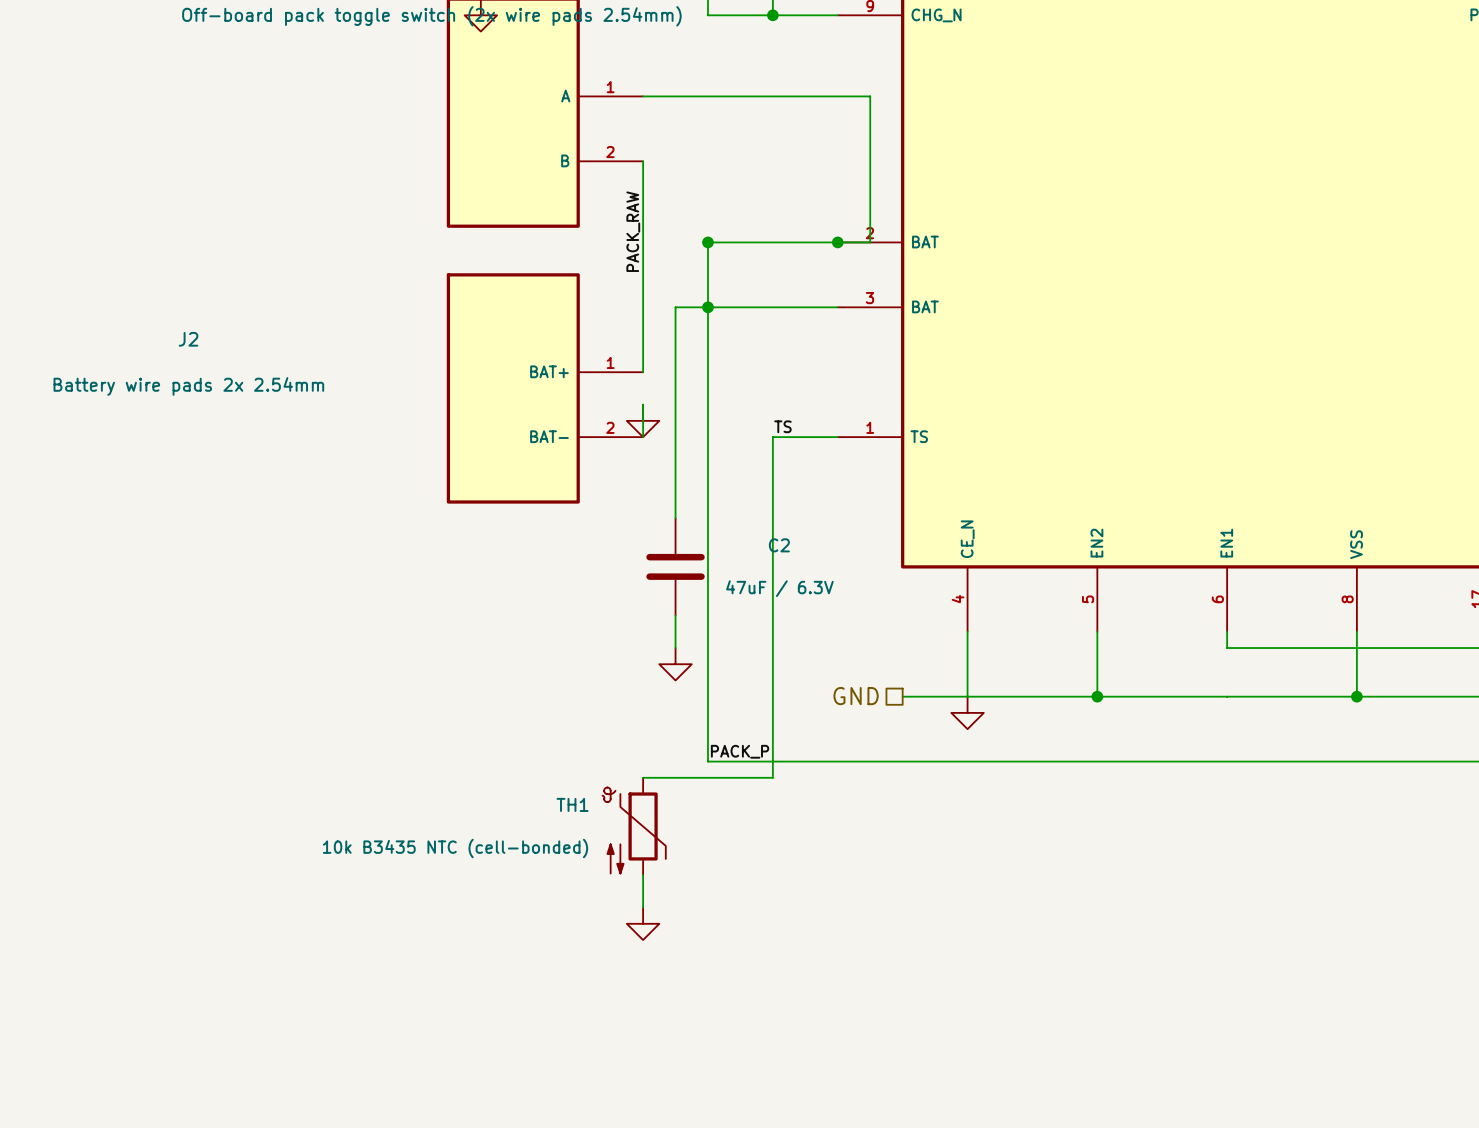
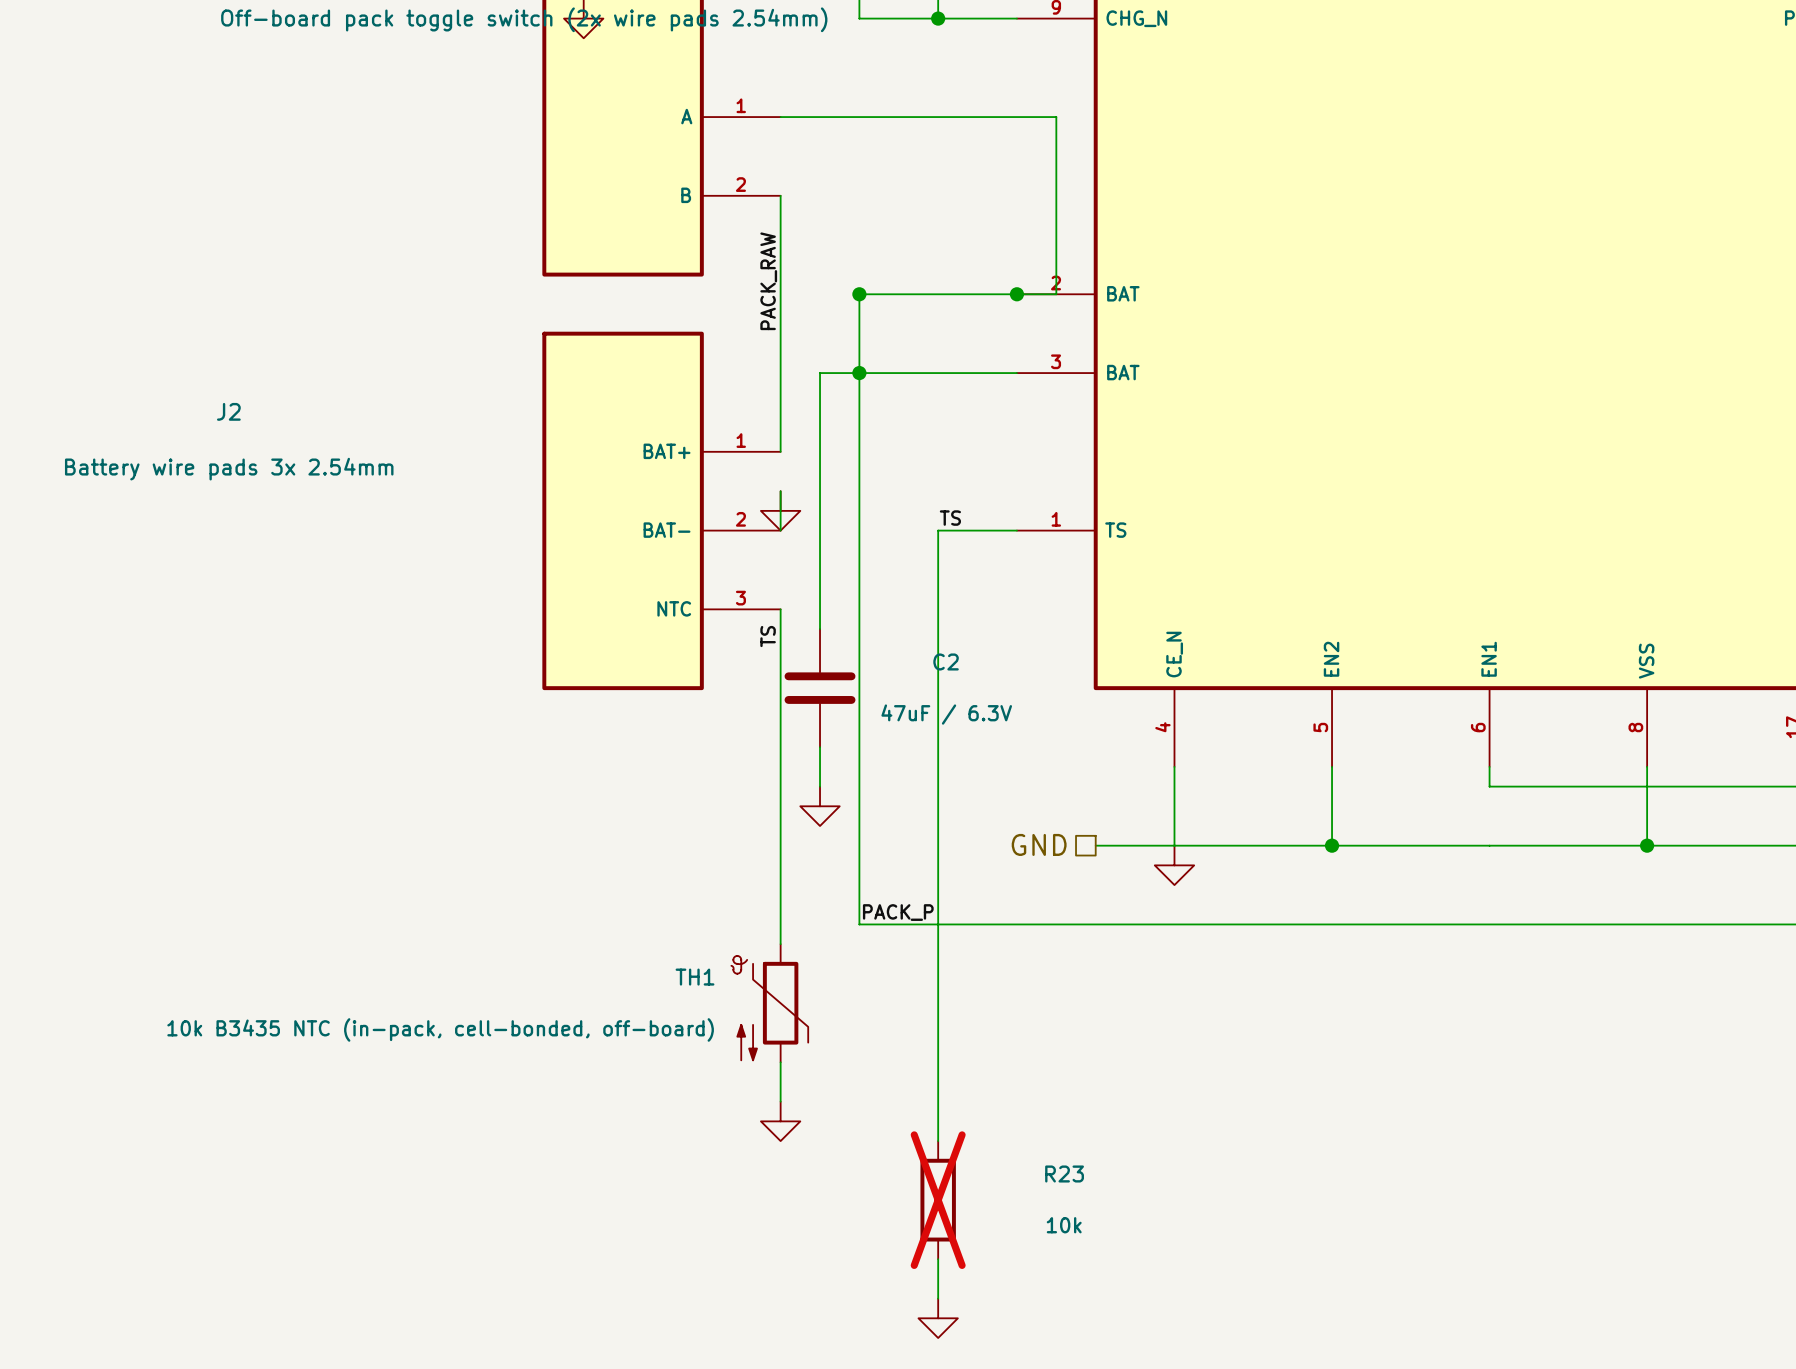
J2 symbol: [446, 273, 644, 504] -> [542, 331, 781, 691]
J2 value: Battery wire pads 2x 2.54mm (188, 386) -> Battery wire pads 3x 2.54mm (229, 469)
wire: none -> (780, 609) (780, 944)
label: none -> TS (768, 636)
wire: (643, 777) (772, 777) -> (938, 1141) (938, 944)
TH1 value: 10k B3435 NTC (cell-bonded) (455, 848) -> 10k B3435 NTC (in-pack, cell-bonded, off-board) (440, 1029)
R23: none -> 10k (938, 1200)
wire: none -> (938, 1259) (938, 1298)
power symbol: none -> (938, 1318)

